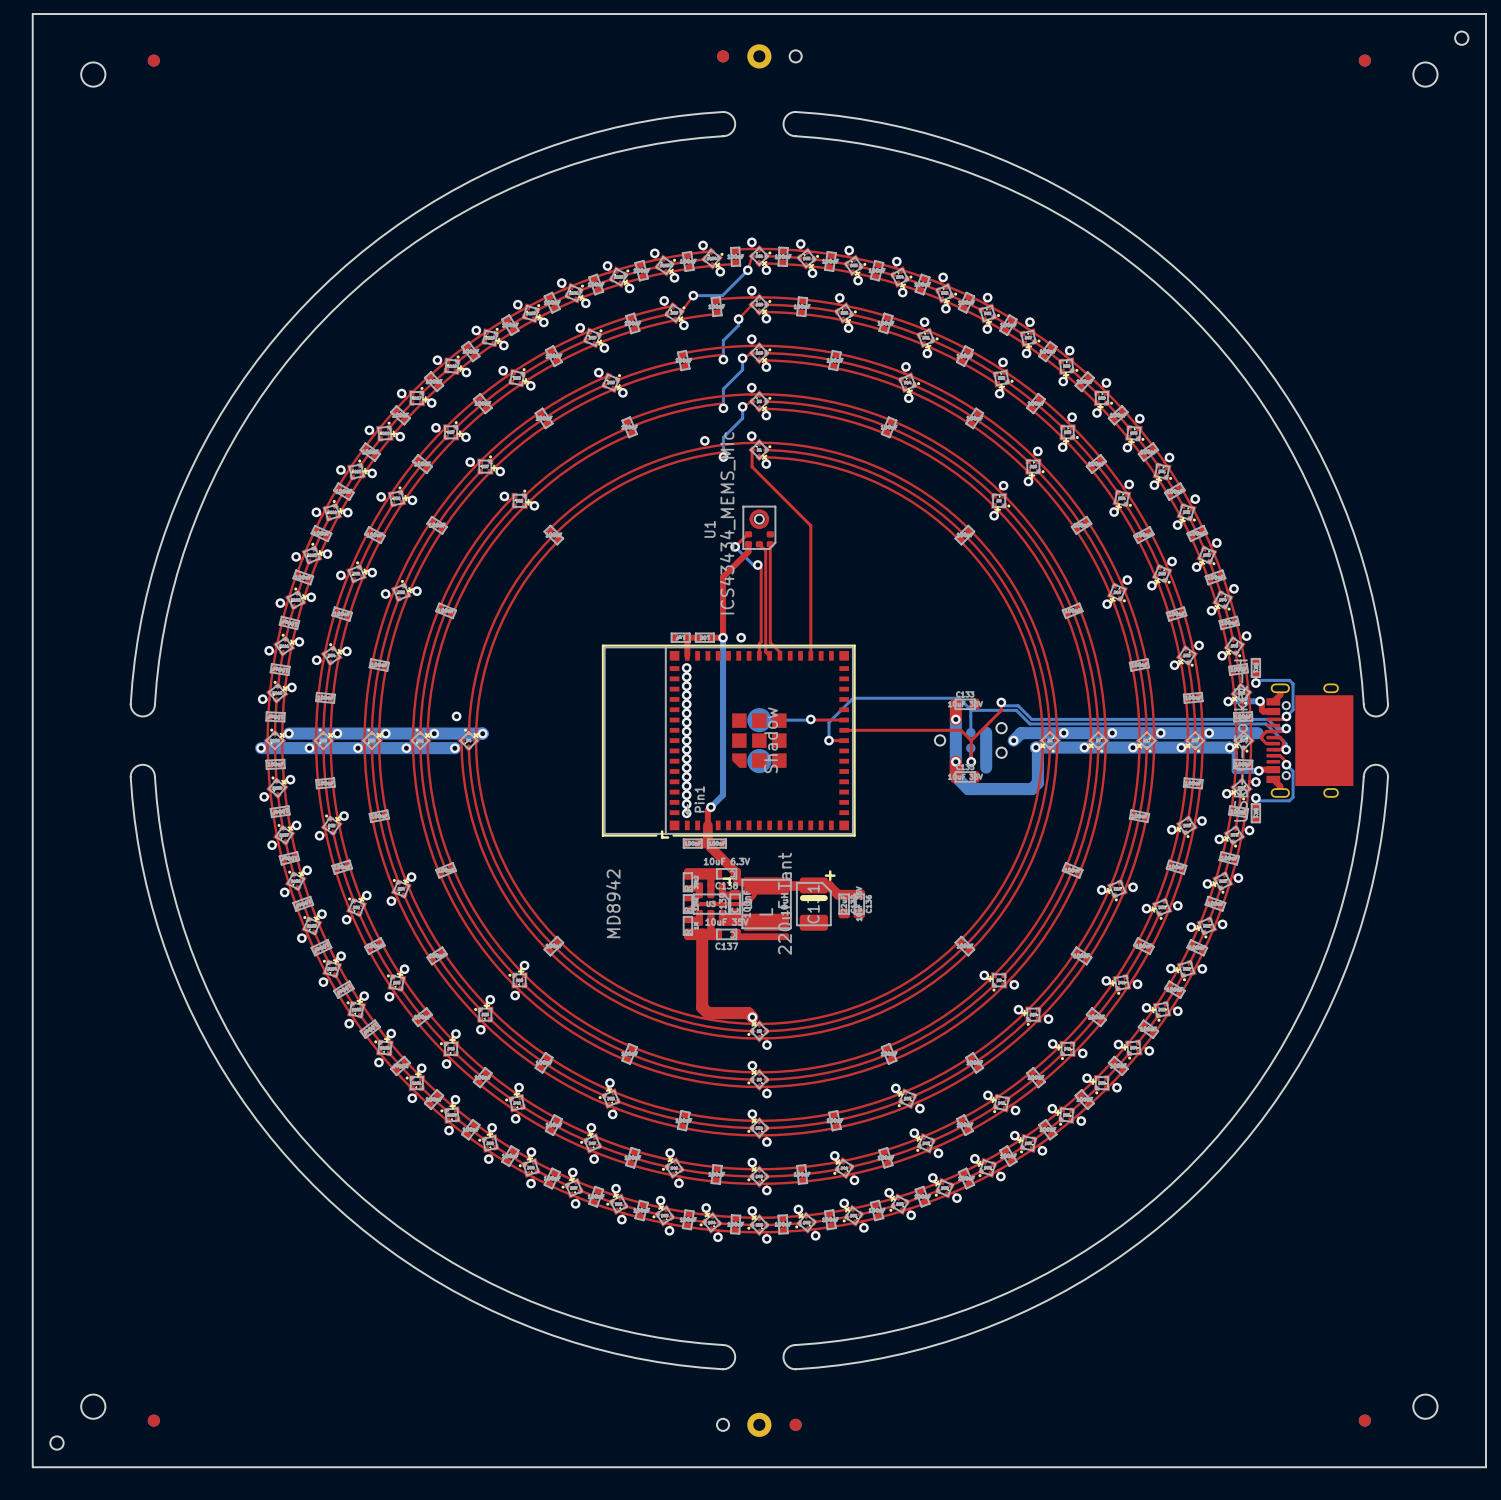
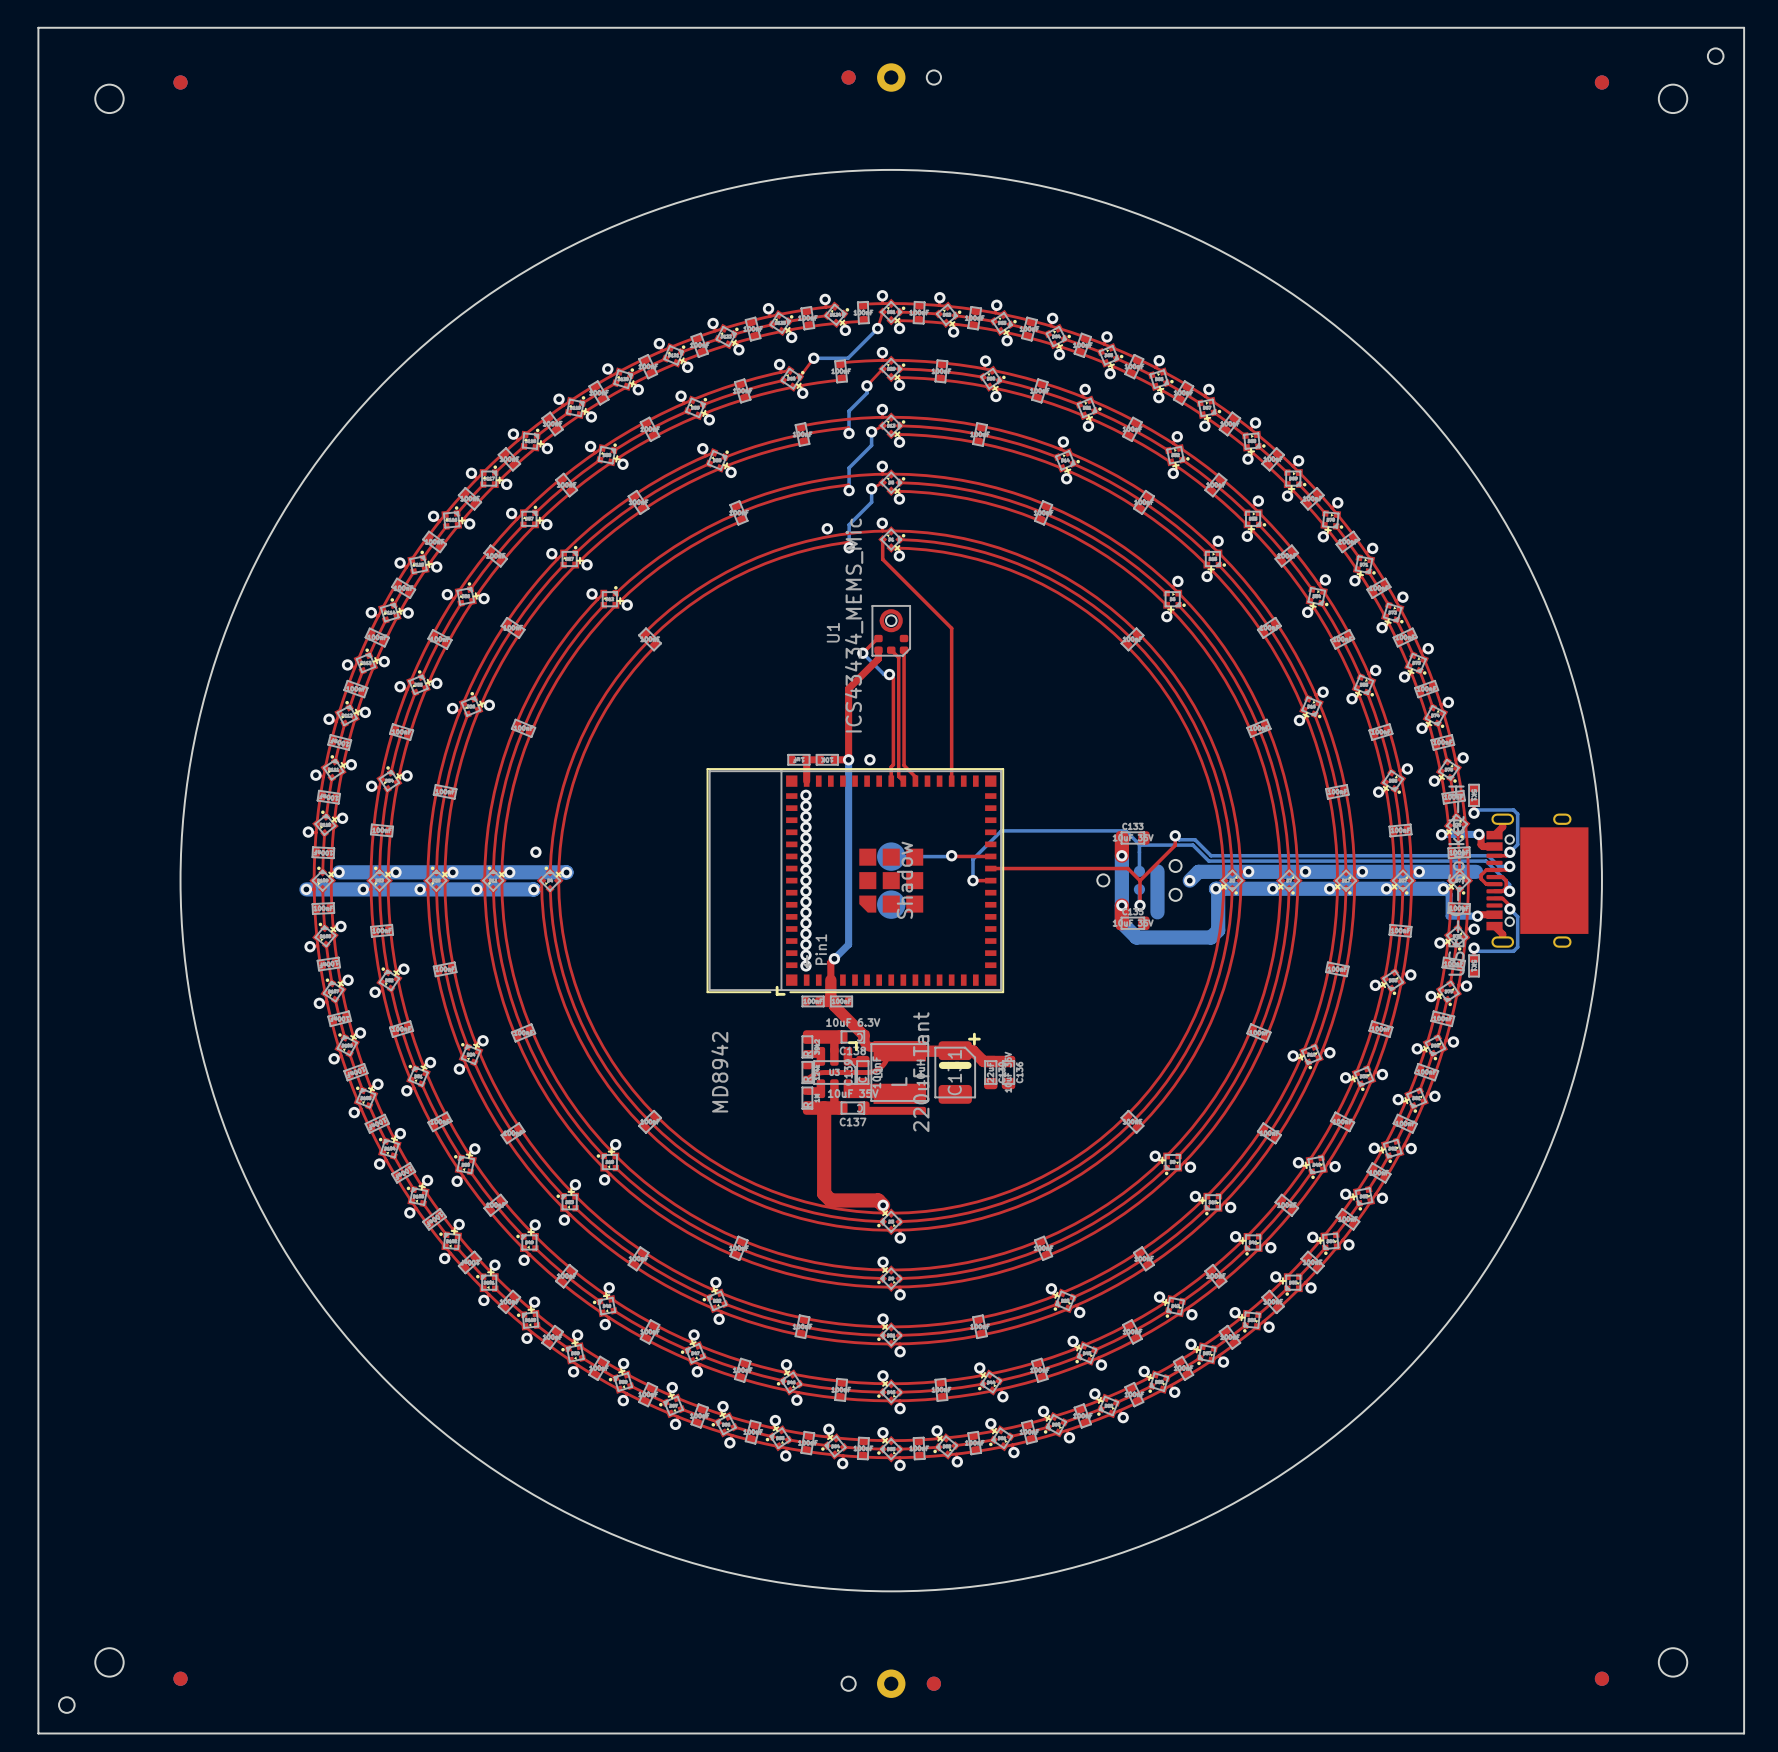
board edge: (723, 111) (658, 119) (615, 127) (552, 145) (511, 161) (472, 180) (415, 213) (362, 251) (314, 295) (270, 343) (244, 378) (209, 434) (180, 492) (157, 554) (141, 617) (134, 660) (130, 704) (134, 713) (145, 716) (154, 708) (162, 638) (171, 595) (190, 532) (216, 472) (237, 433) (273, 378) (301, 344) (331, 312) (363, 282) (415, 242) (452, 218) (491, 197) (551, 171) (614, 152) (657, 143) (727, 135) (733, 130) (735, 122) (731, 115) (723, 111) -> none
board edge: (795, 111) (787, 115) (783, 122) (785, 130) (791, 135) (861, 143) (904, 152) (967, 171) (1027, 197) (1066, 218) (1103, 242) (1138, 268) (1187, 312) (1217, 344) (1244, 378) (1269, 415) (1302, 472) (1328, 532) (1347, 595) (1356, 638) (1364, 708) (1373, 716) (1383, 713) (1388, 704) (1383, 660) (1376, 617) (1360, 554) (1338, 492) (1309, 434) (1274, 378) (1234, 327) (1204, 295) (1156, 251) (1121, 225) (1084, 201) (1026, 170) (986, 153) (924, 133) (860, 119) (795, 111) -> none
round board edge: none -> [180, 169, 1603, 1592]
board edge: (130, 776) (134, 820) (146, 884) (164, 947) (189, 1008) (220, 1065) (244, 1102) (270, 1137) (314, 1185) (362, 1229) (415, 1268) (452, 1290) (511, 1319) (573, 1342) (636, 1358) (679, 1365) (723, 1369) (732, 1365) (734, 1354) (727, 1345) (657, 1337) (614, 1328) (551, 1309) (491, 1283) (452, 1262) (397, 1226) (363, 1198) (331, 1168) (301, 1136) (273, 1102) (248, 1066) (216, 1008) (190, 948) (171, 885) (162, 842) (154, 772) (148, 766) (141, 764) (133, 769) (130, 776) -> none
board edge: (1363, 776) (1359, 820) (1347, 885) (1328, 948) (1311, 989) (1281, 1047) (1257, 1084) (1231, 1119) (1187, 1168) (1155, 1198) (1121, 1226) (1084, 1251) (1027, 1283) (967, 1309) (904, 1328) (861, 1337) (790, 1345) (783, 1354) (783, 1360) (787, 1365) (795, 1369) (817, 1367) (882, 1358) (945, 1342) (1007, 1319) (1065, 1290) (1121, 1255) (1156, 1229) (1204, 1185) (1248, 1137) (1286, 1084) (1319, 1027) (1346, 968) (1360, 926) (1372, 884) (1380, 841) (1386, 798) (1387, 775) (1383, 767) (1378, 765) (1371, 765) (1365, 770) (1363, 776) -> none

